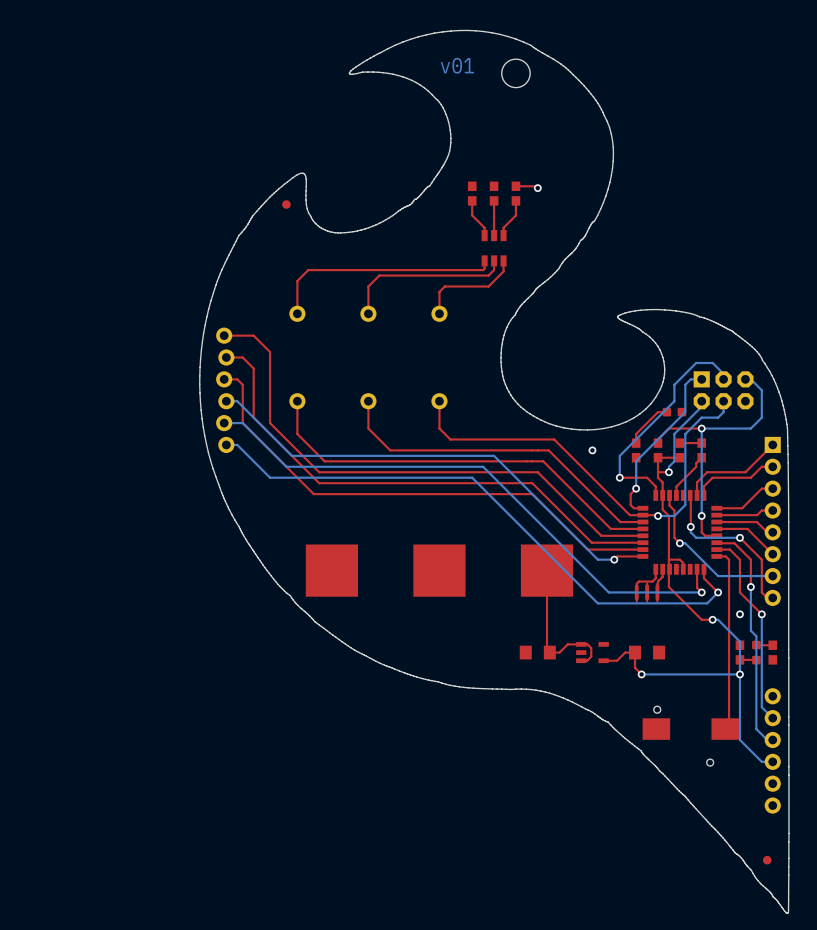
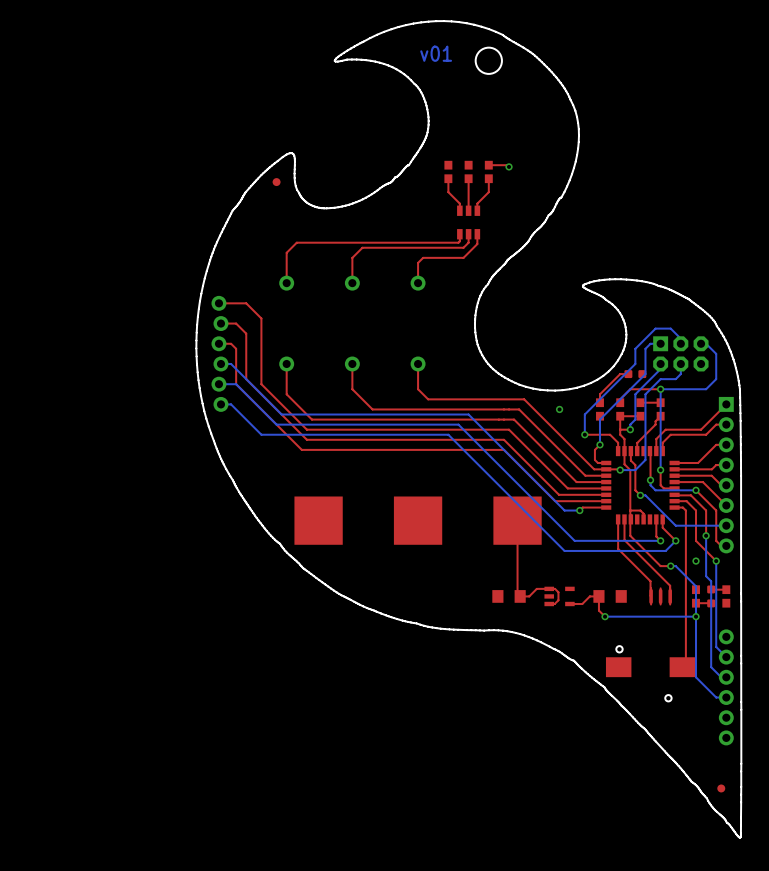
top track: (662, 576) (658, 581) (657, 592) -> (624, 526) (624, 540) (670, 585) (670, 588)
top track: (655, 578) (652, 581) (638, 581) (636, 583) -> (618, 527) (618, 548) (650, 581) (651, 596)
part position: (647, 592) -> (660, 596)

